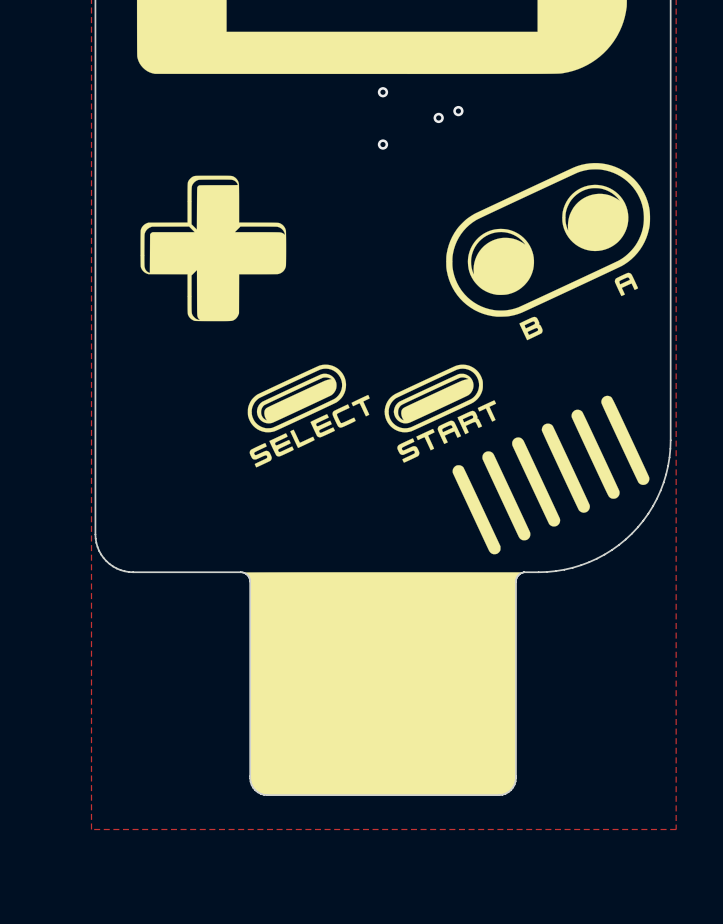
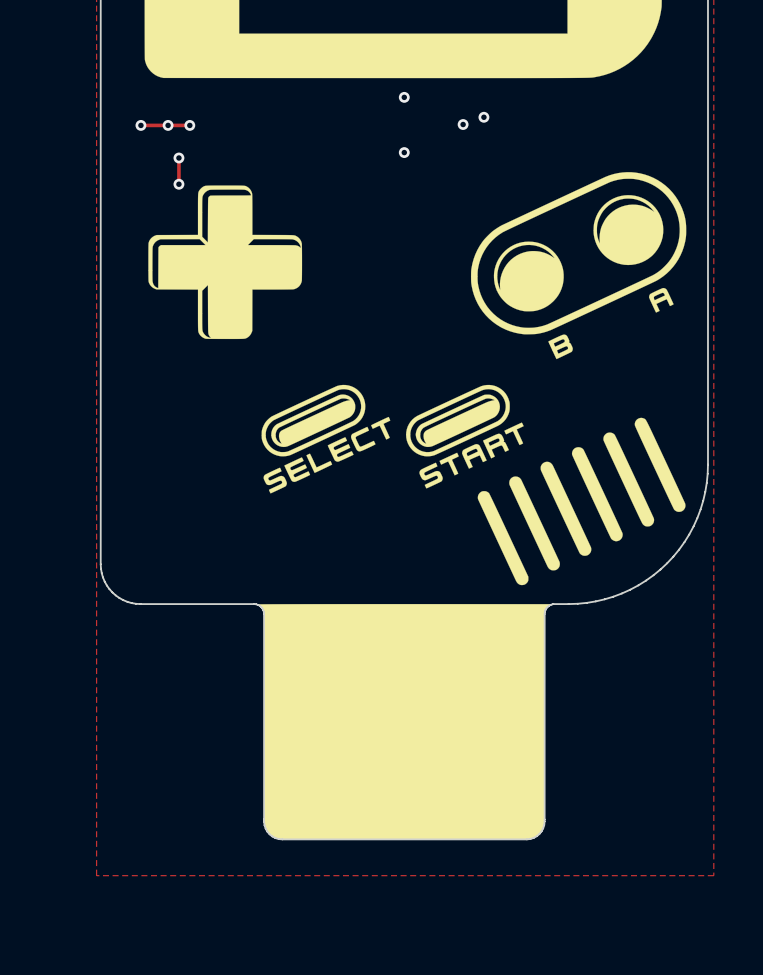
track: none -> (140, 125) (189, 125)
via: none -> (140, 125)
via: none -> (168, 125)
via: none -> (189, 125)
track: none -> (178, 158) (178, 184)
via: none -> (178, 158)
via: none -> (178, 184)

